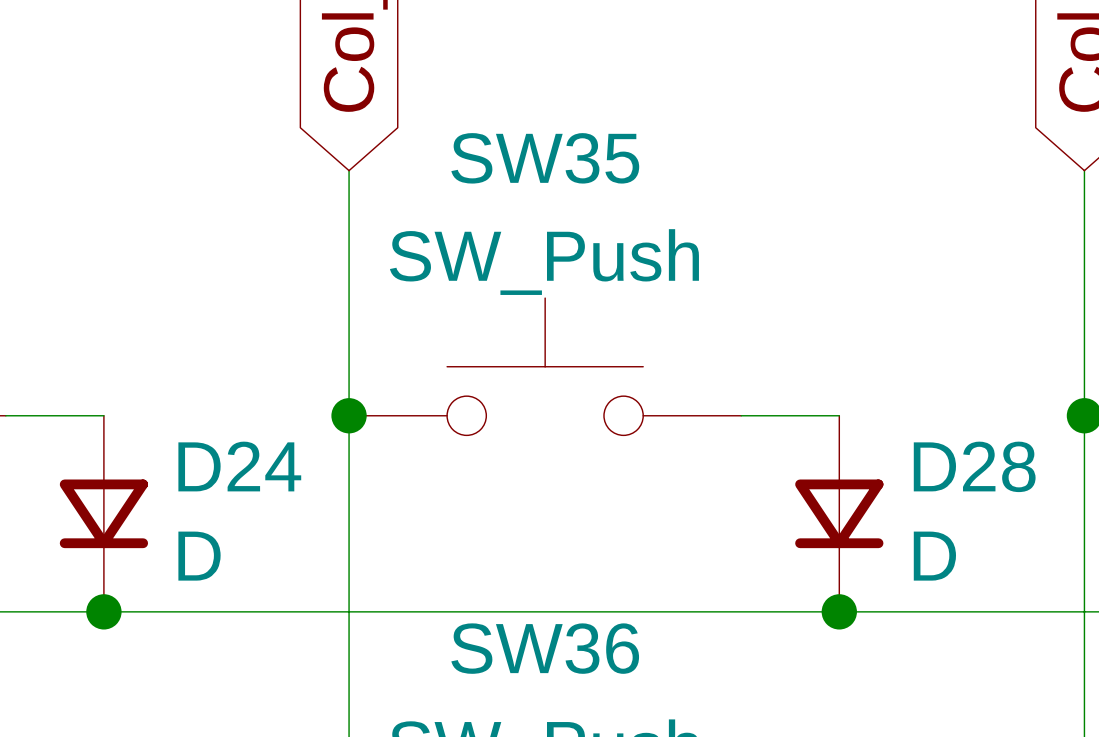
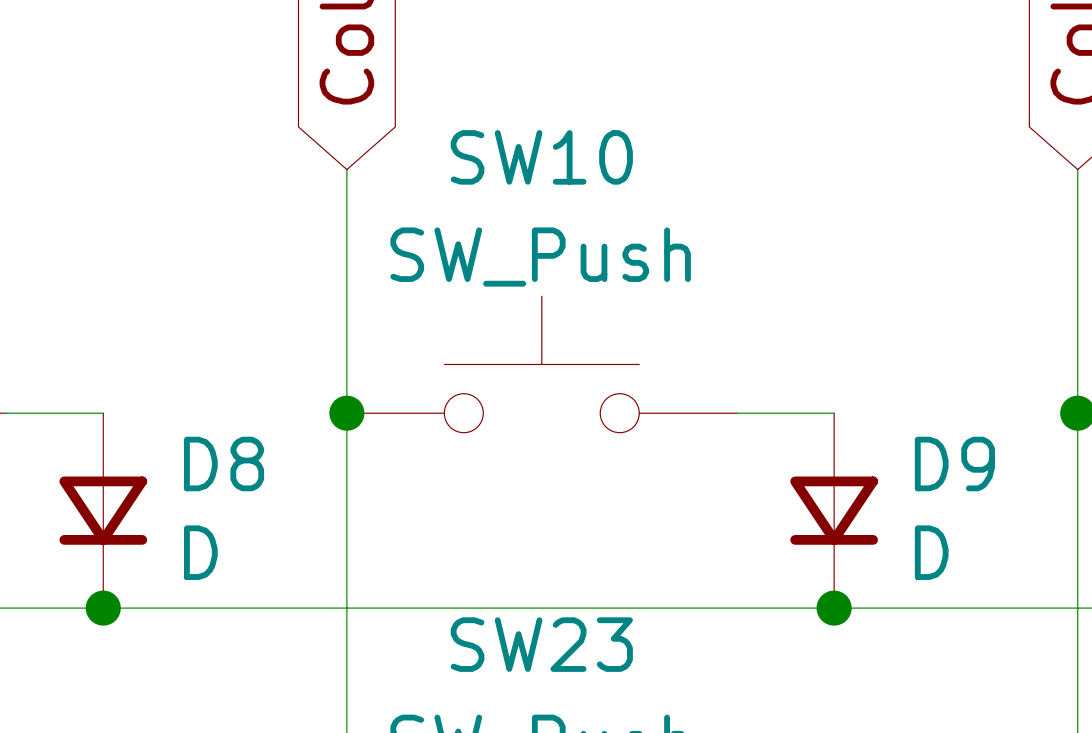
SW35 name: SW35 (545, 158) -> SW10 (541, 157)
D24 name: D24 (239, 466) -> D8 (224, 463)
D28 name: D28 (974, 466) -> D9 (954, 463)
SW36 name: SW36 (545, 648) -> SW23 (541, 644)

